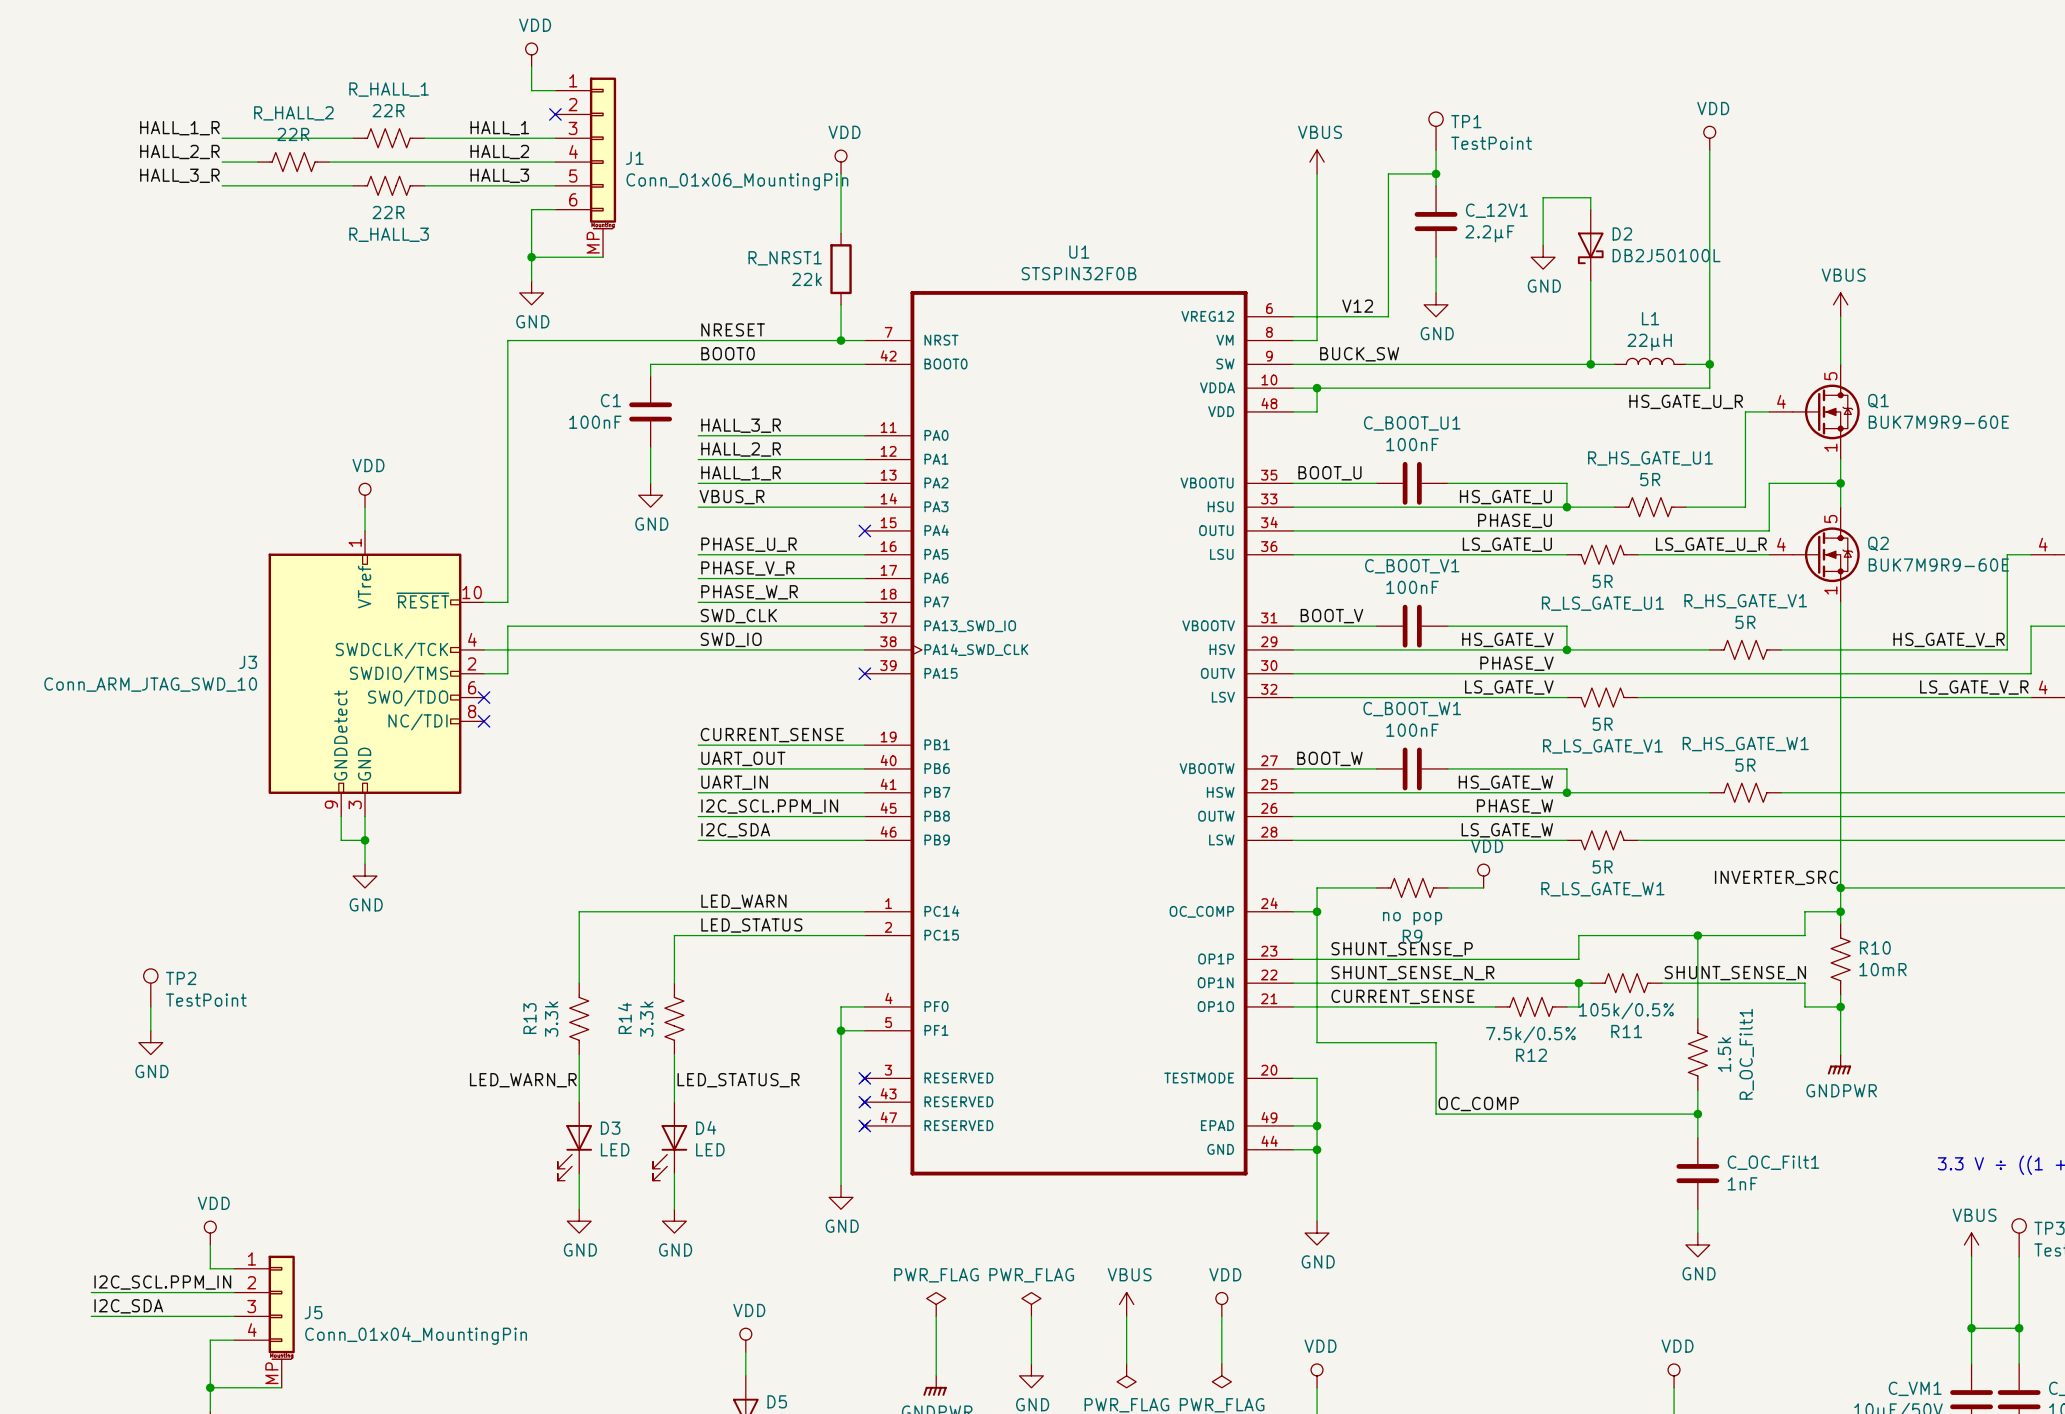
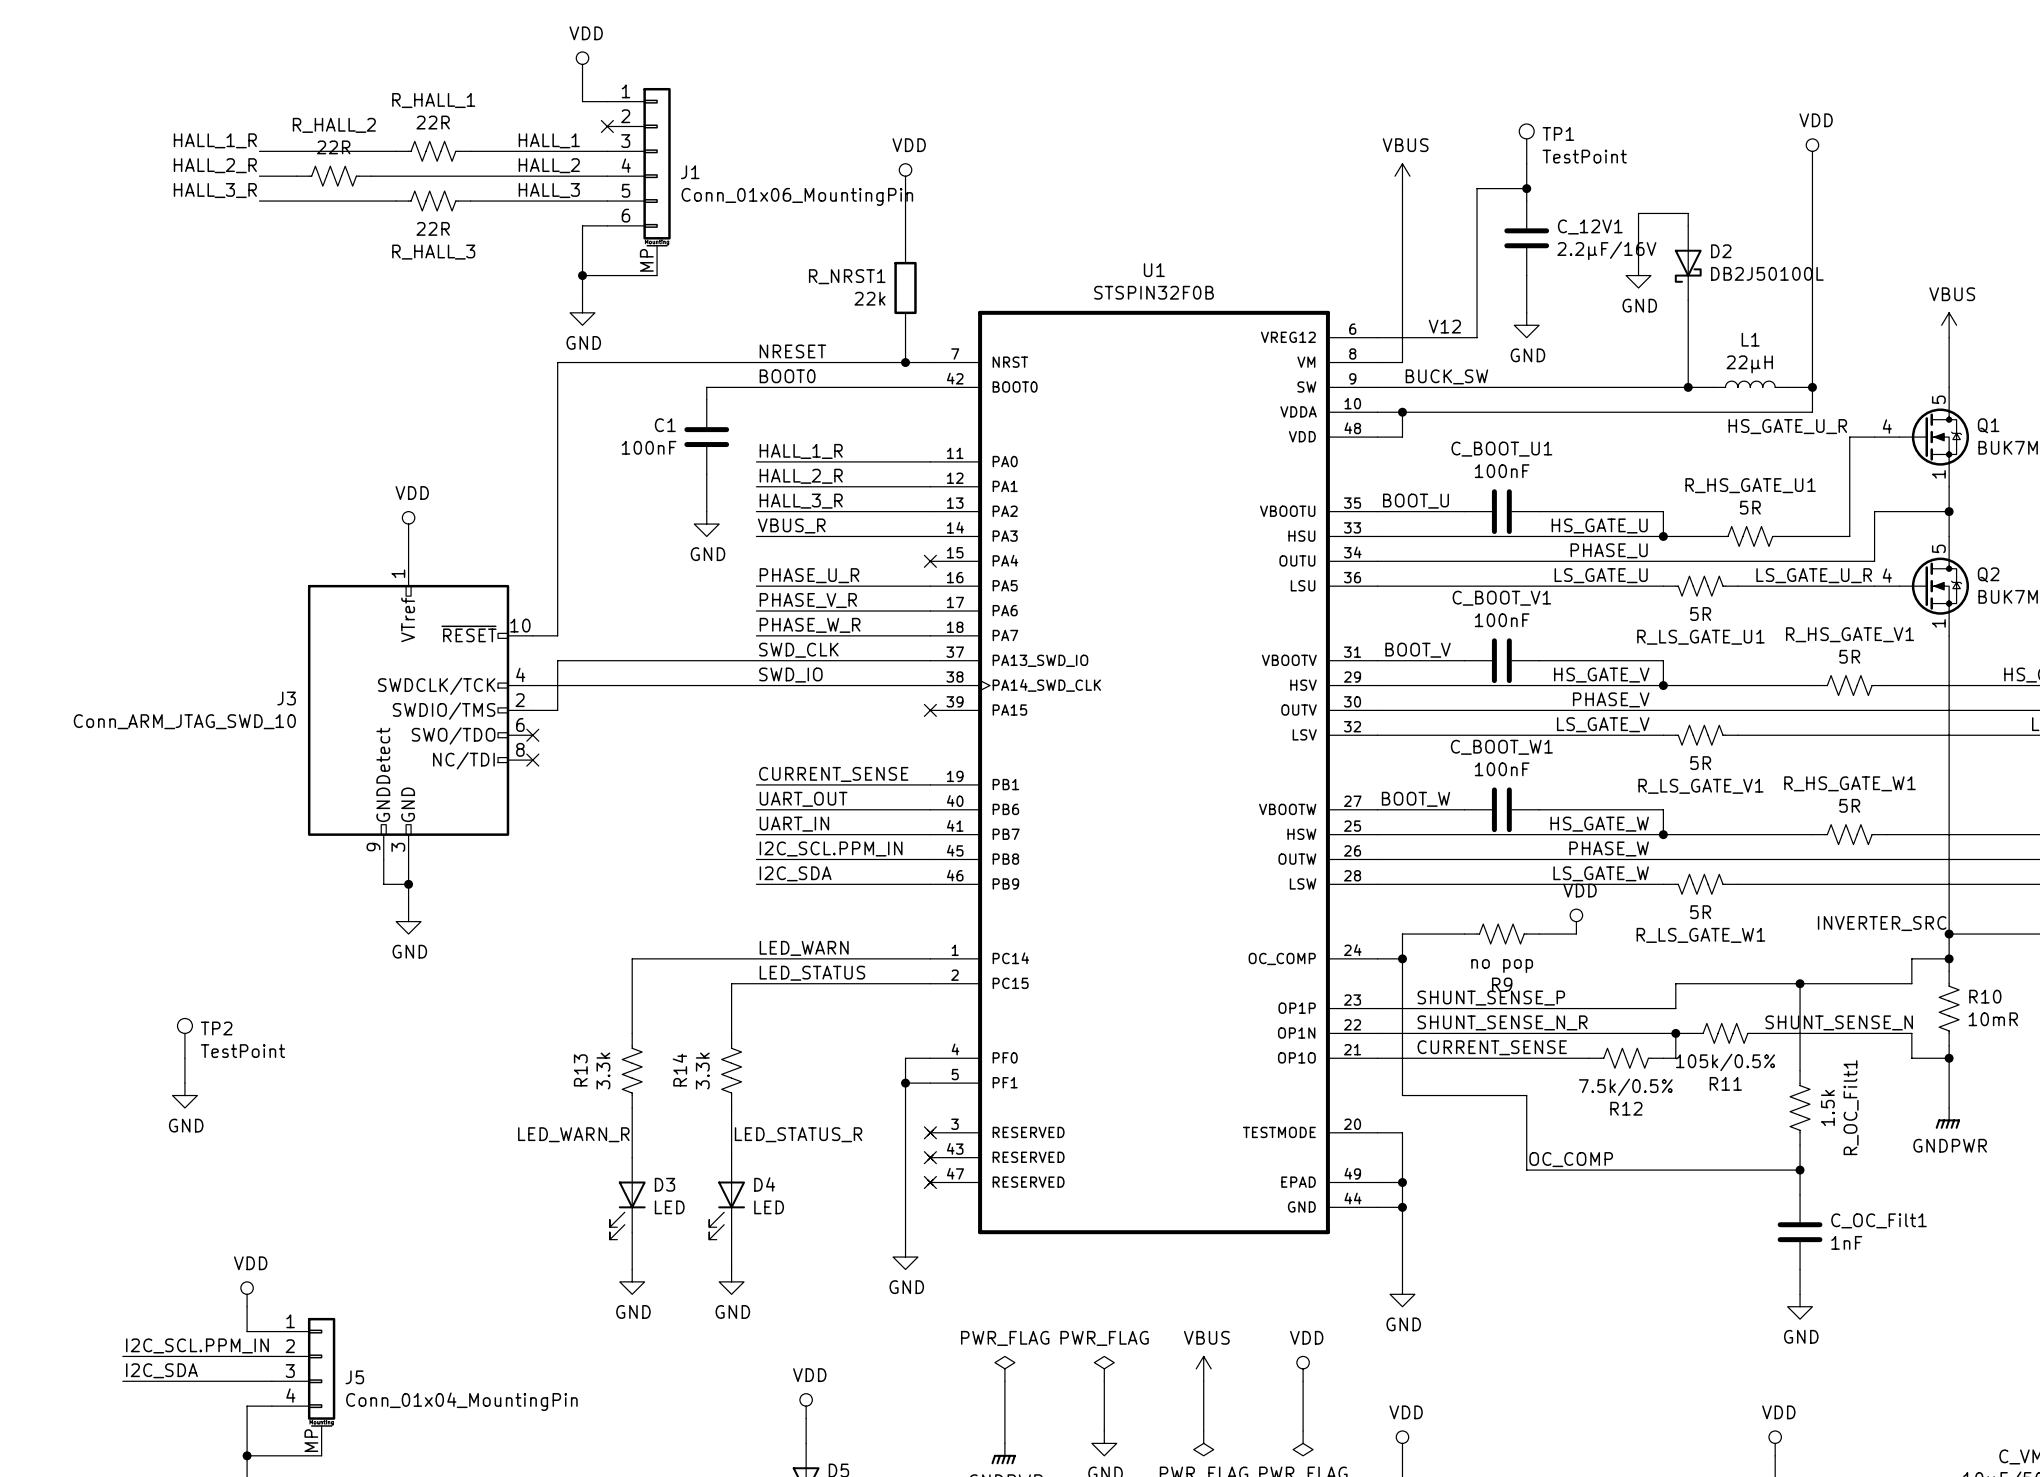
C_12V1 value: 2.2µF (1489, 233) -> 2.2µF/16V (1606, 250)
label: HALL_3_R (741, 425) -> HALL_1_R (801, 451)
label: HALL_1_R (741, 473) -> HALL_3_R (801, 501)

